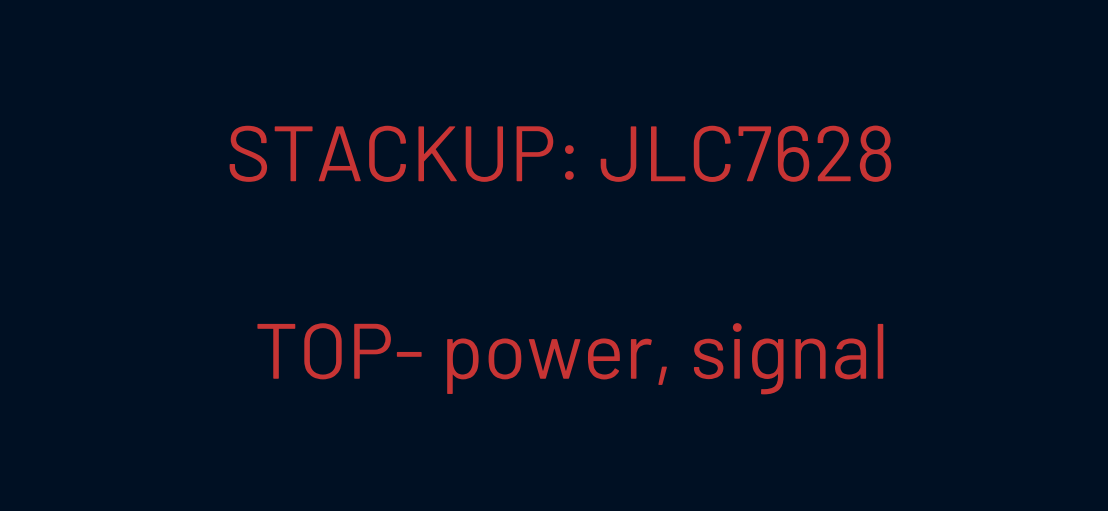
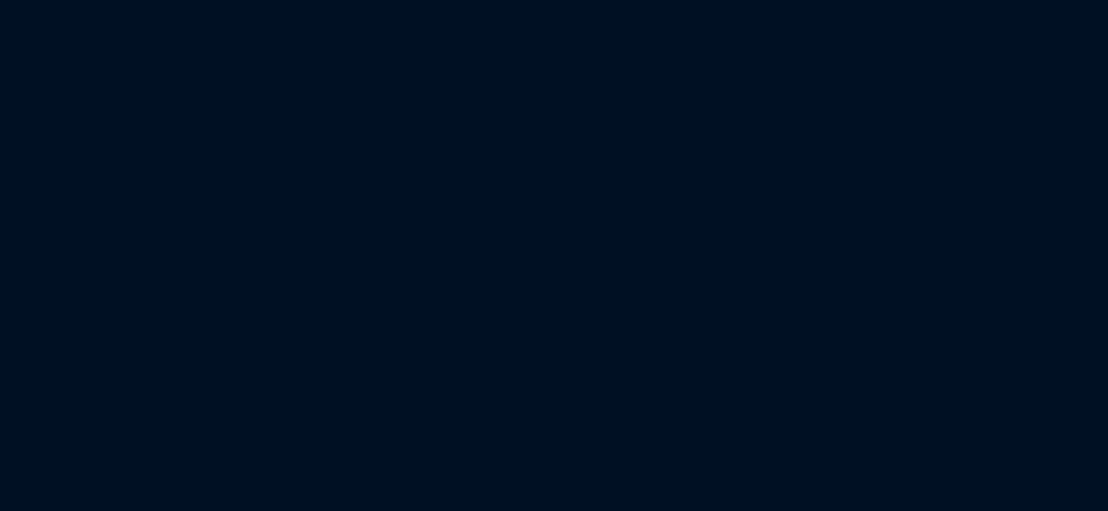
text: STACKUP: JLC7628 (560, 153) -> none
text: TOP- power, signal (570, 358) -> none

